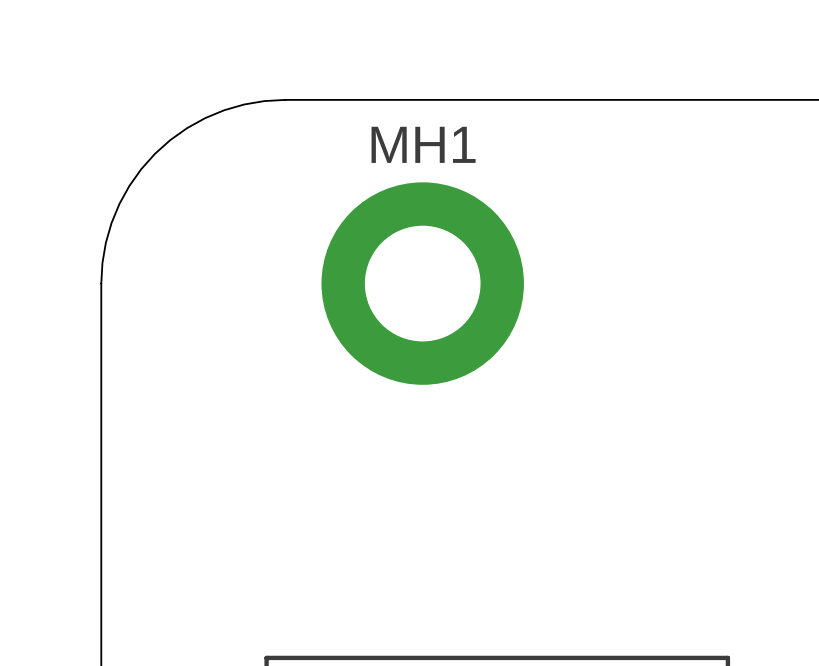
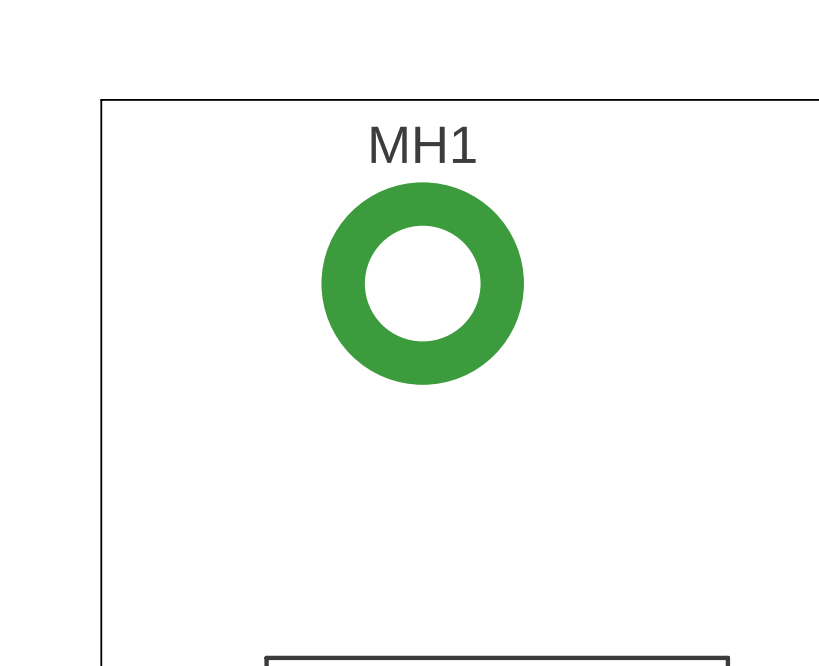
board edge: (284, 99) (244, 104) (205, 118) (170, 139) (155, 153) (141, 169) (119, 203) (105, 242) (101, 283) -> (284, 99) (101, 99) (101, 283)

